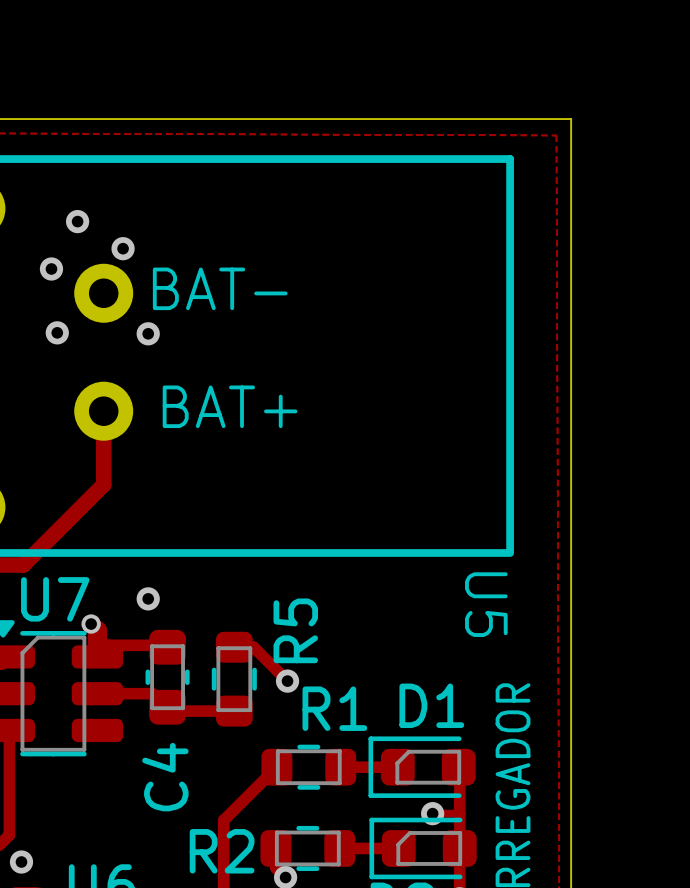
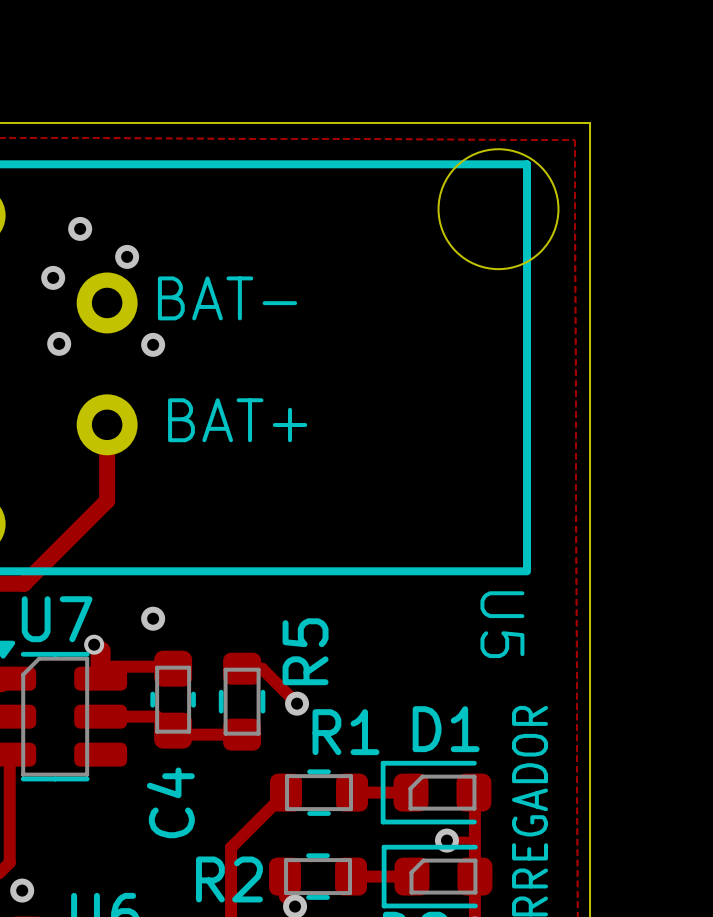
round board edge: none -> [437, 148, 560, 271]

